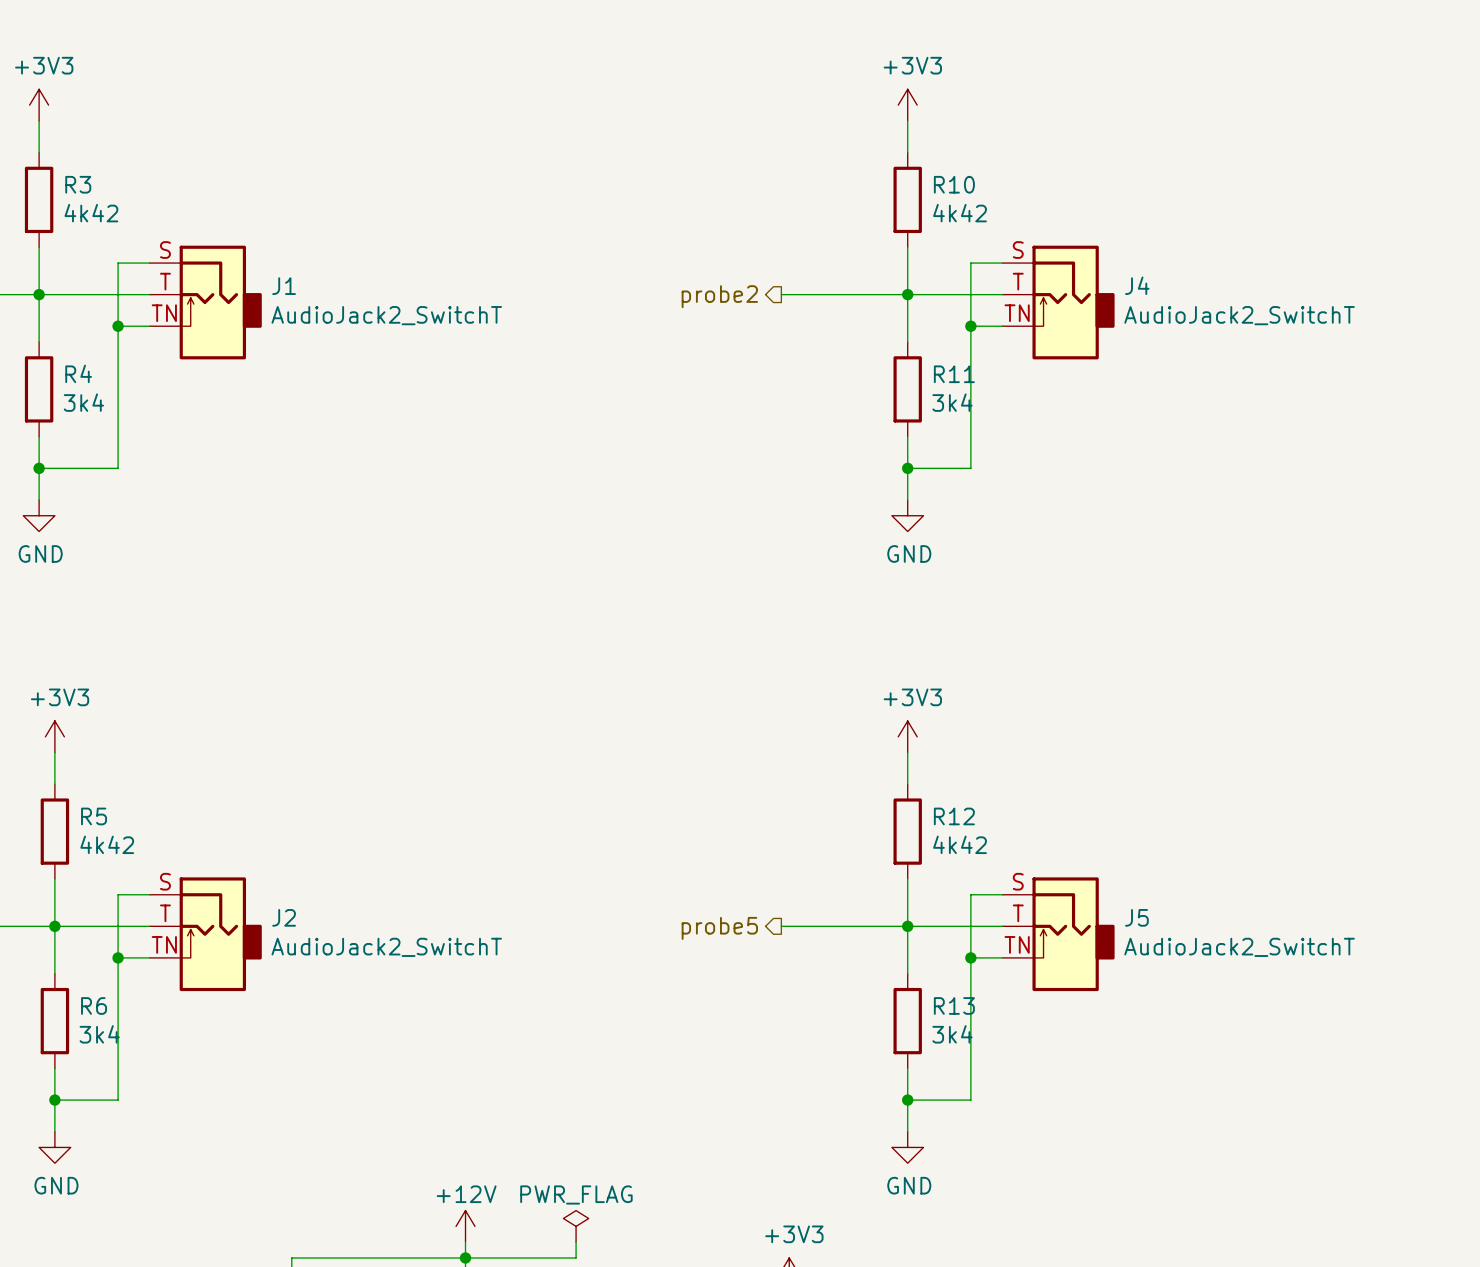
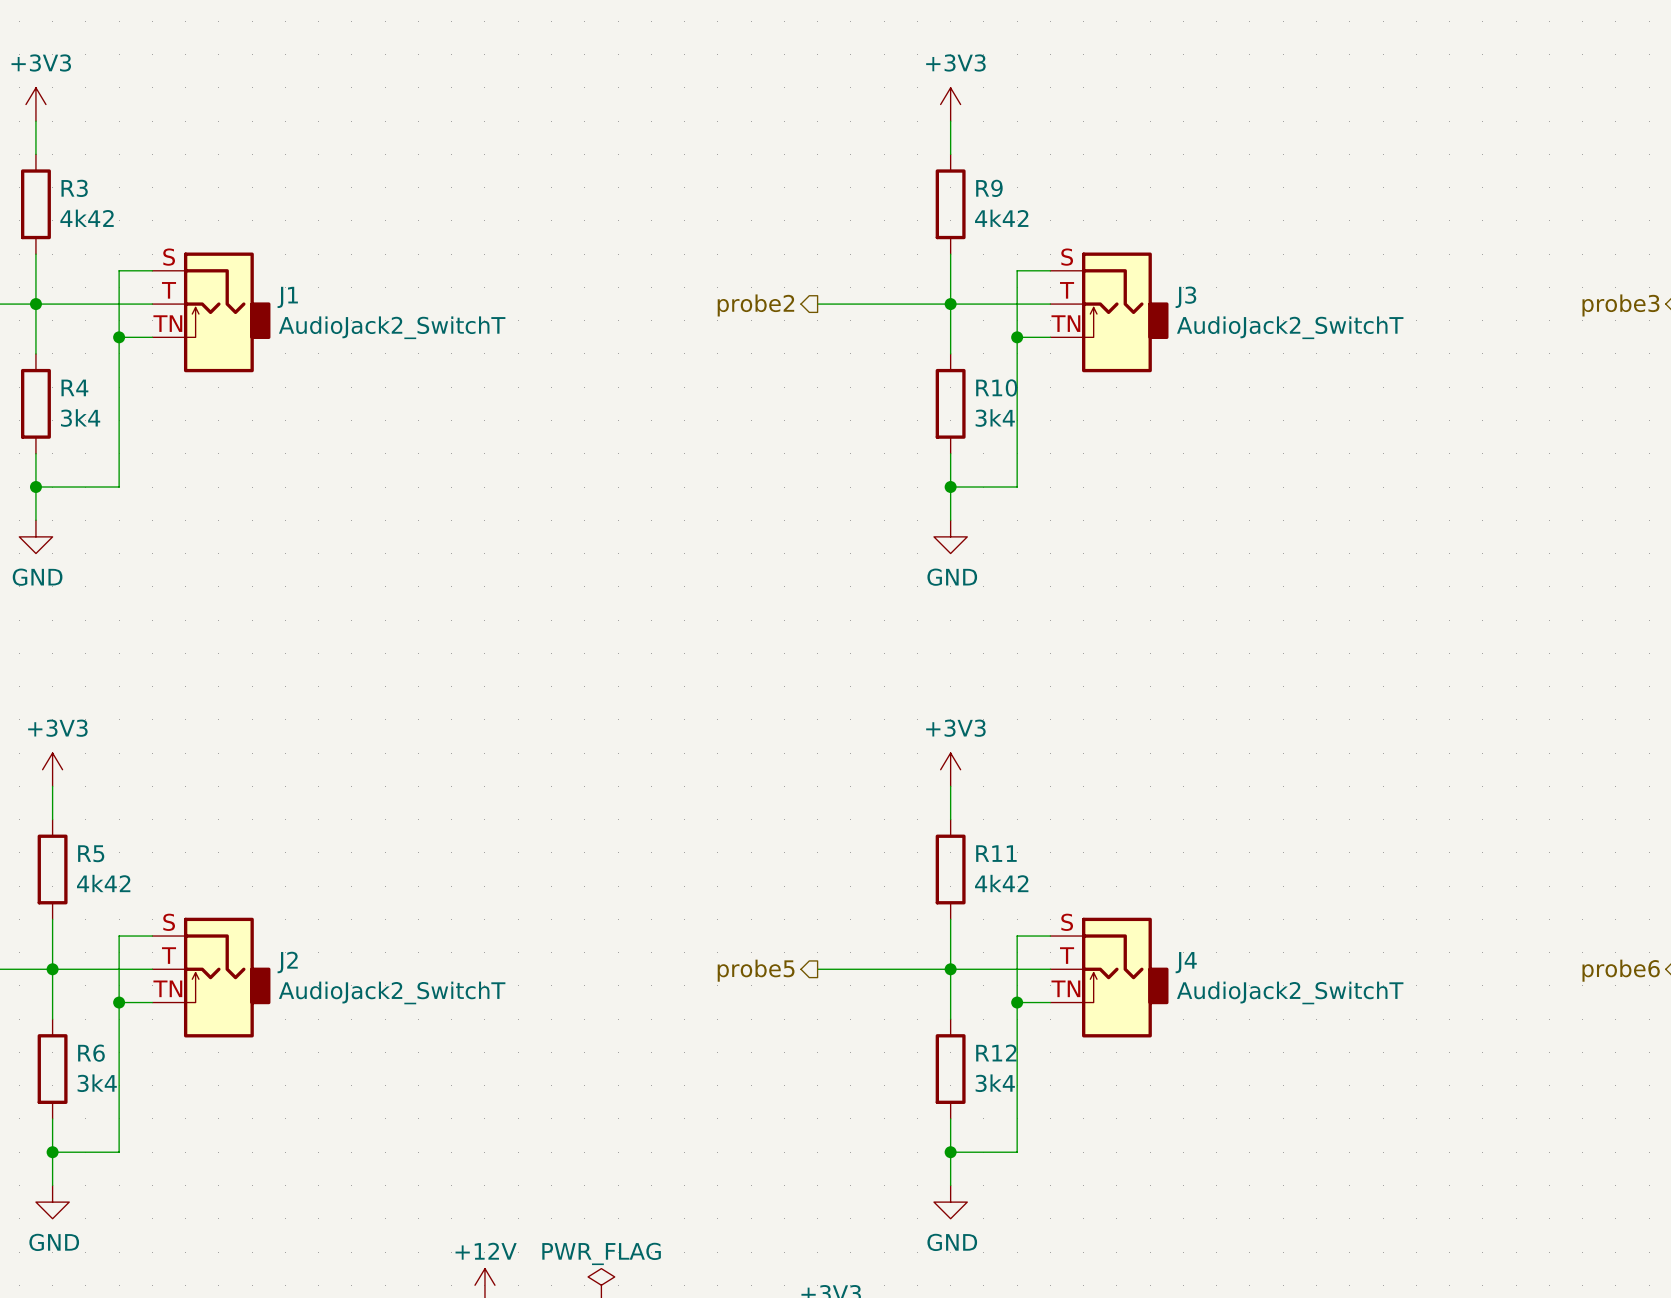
R10 name: R10 (954, 184) -> R9 (989, 188)
J4 name: J4 (1137, 285) -> J3 (1185, 297)
R11 name: R11 (954, 374) -> R10 (996, 387)
R12 name: R12 (954, 816) -> R11 (996, 853)
J5 name: J5 (1136, 917) -> J4 (1186, 962)
R13 name: R13 (954, 1005) -> R12 (996, 1052)

